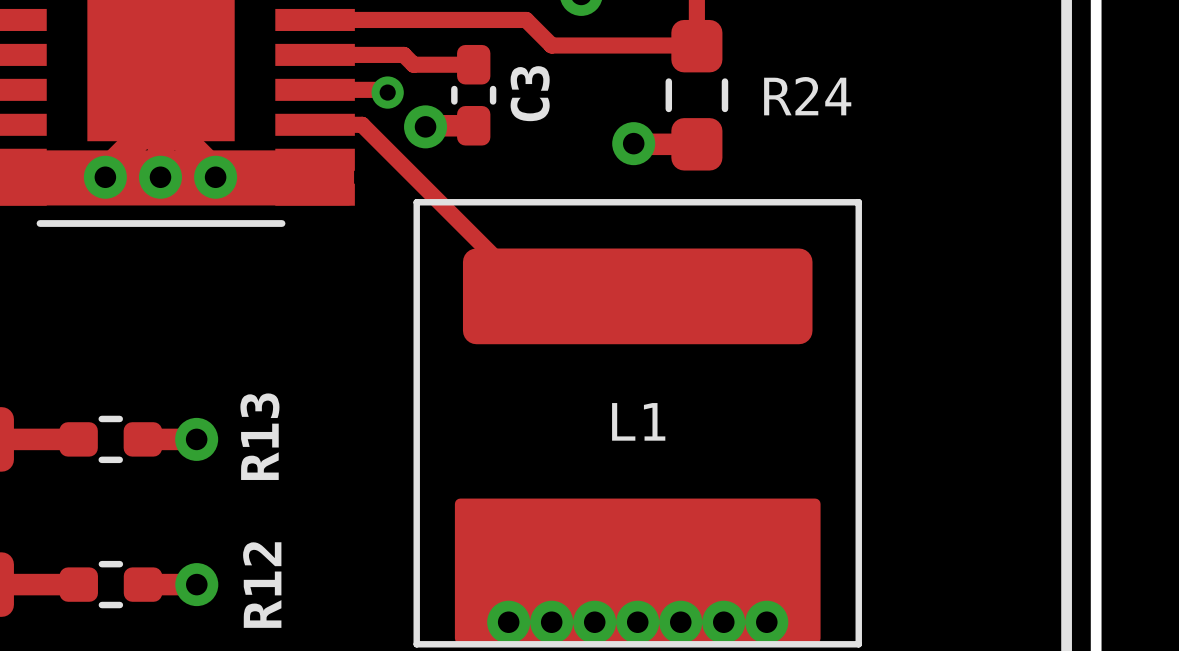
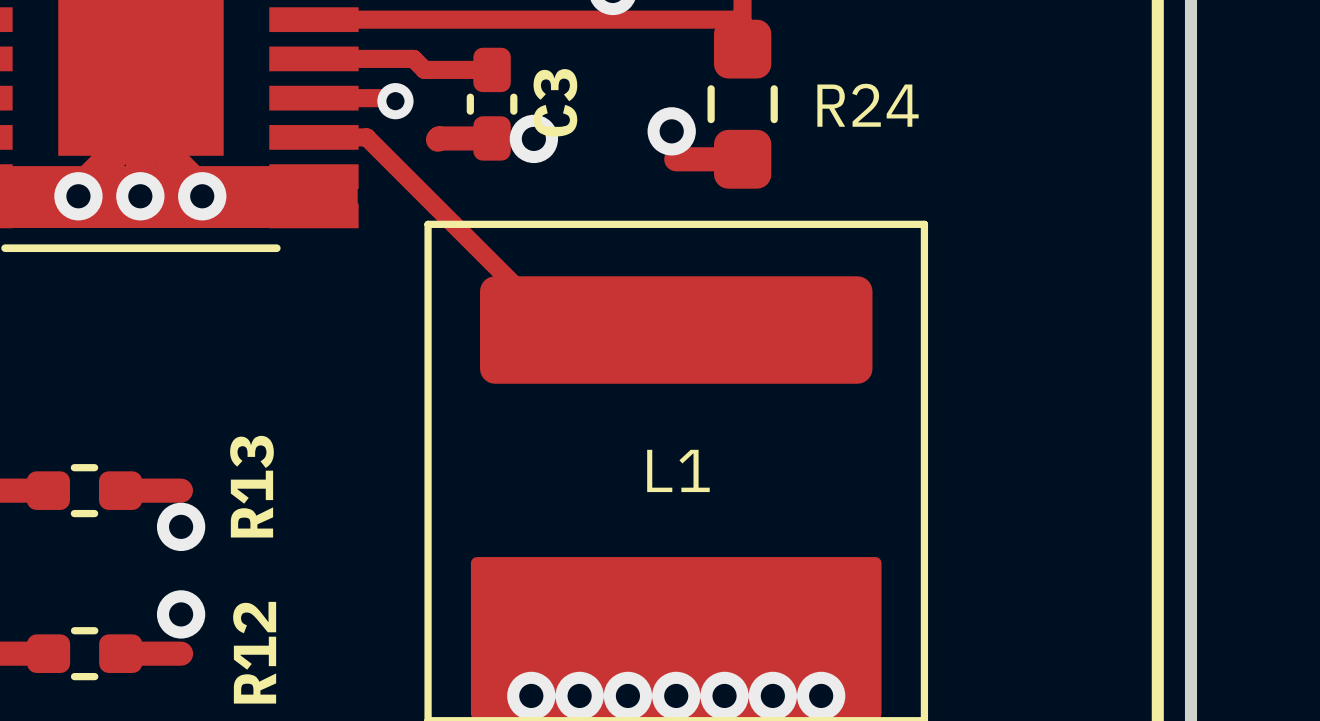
track: (526, 19) (551, 45) (696, 45) -> (550, 19) (740, 19) (742, 21)
via: (425, 126) -> none
via: none -> (533, 138)
via position: (633, 143) -> (671, 131)
via position: (196, 439) -> (181, 526)
via position: (196, 584) -> (181, 614)

